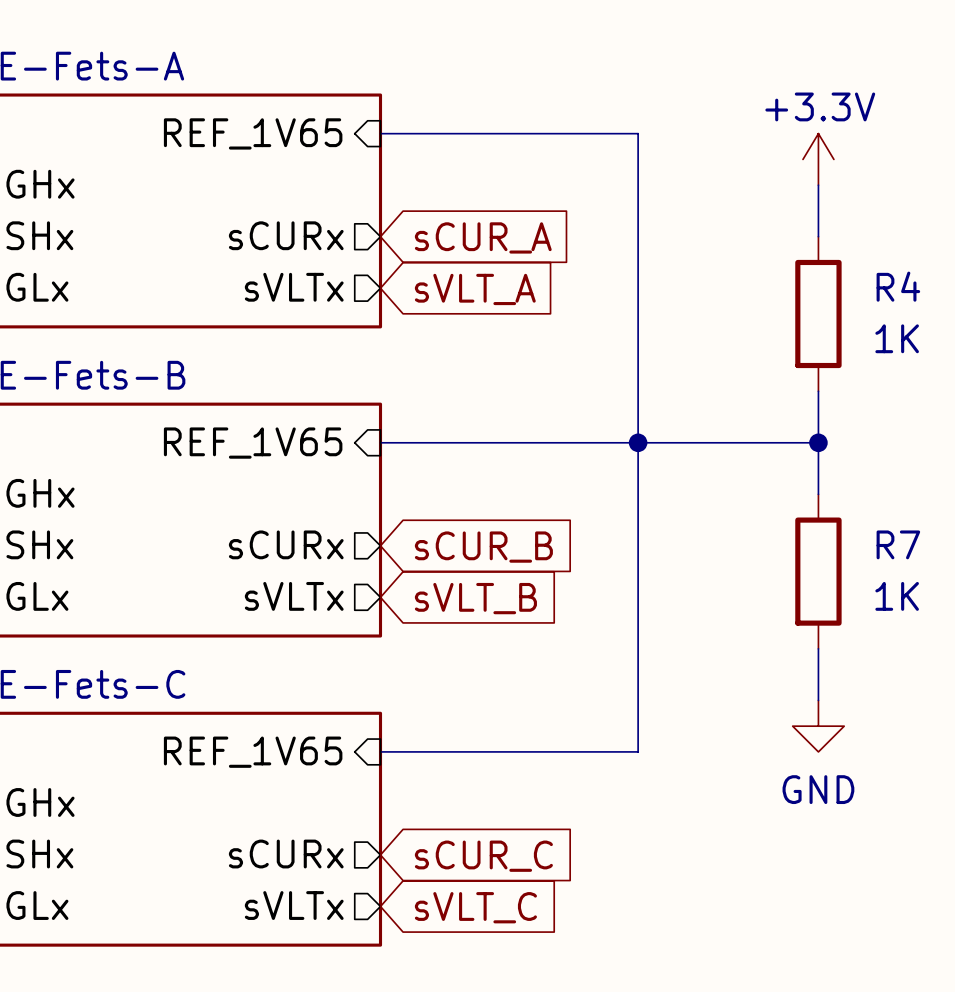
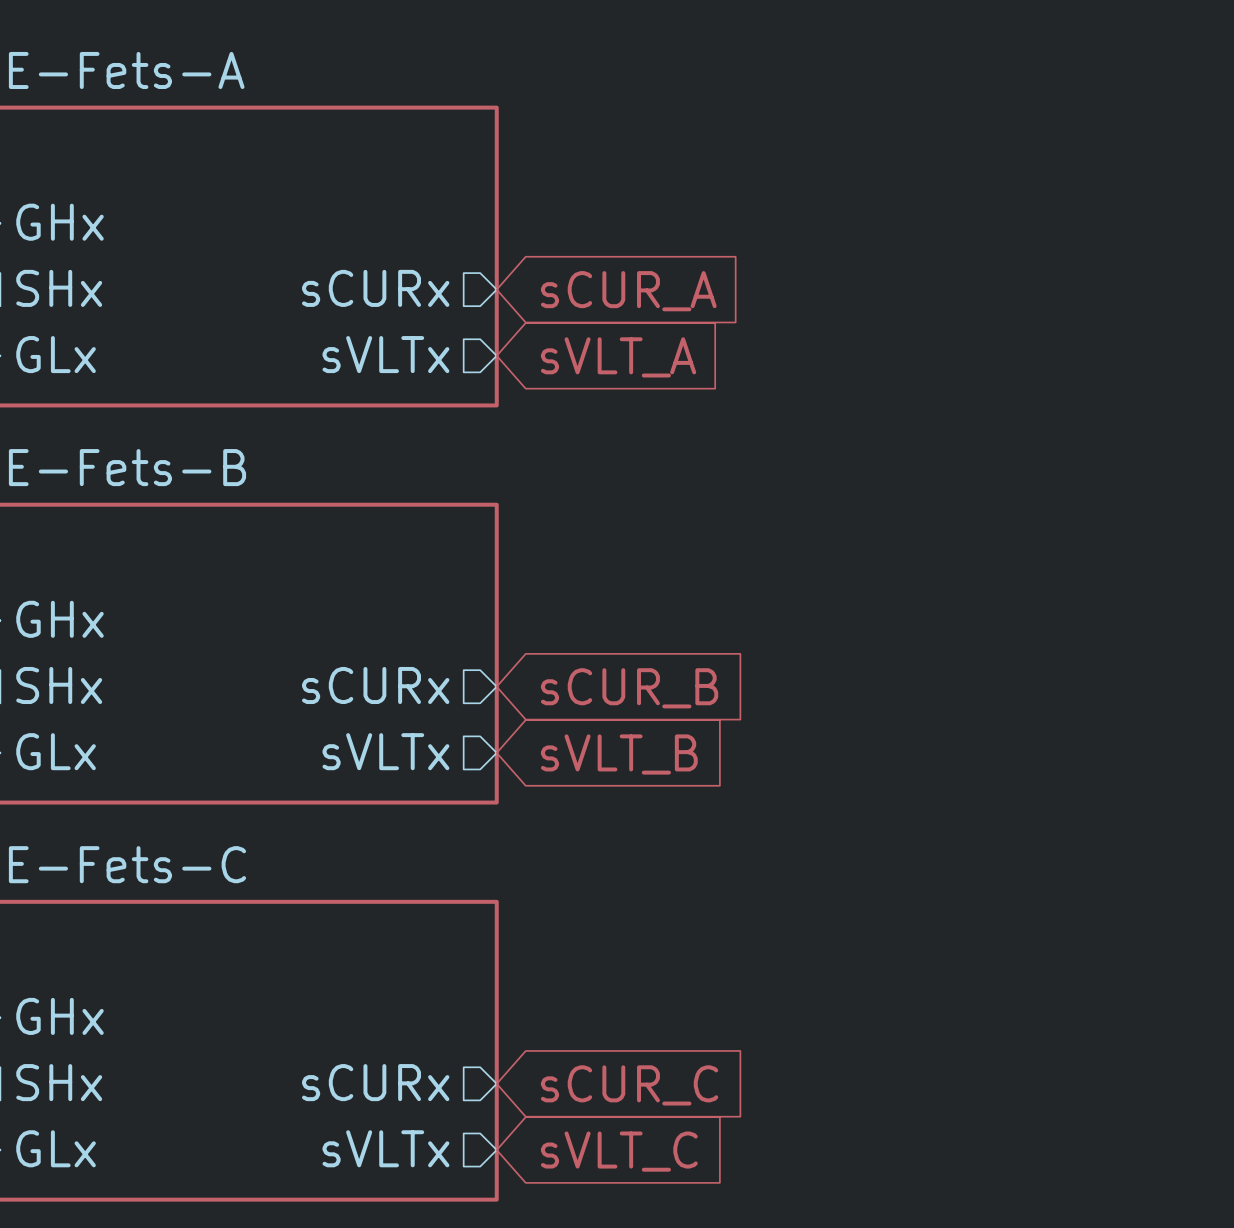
sheet pin: REF_1V65 (253, 133) -> none
wire: (380, 133) (638, 133) (638, 751) (380, 751) -> none
power symbol: +3.3V (818, 159) -> none
wire: (818, 185) (818, 236) -> none
R4: 1K (818, 313) -> none
wire: (818, 391) (818, 494) -> none
wire: (380, 442) (818, 442) -> none
junction: (638, 442) -> none
junction: (818, 442) -> none
sheet pin: REF_1V65 (253, 443) -> none
R7: 1K (818, 571) -> none
wire: (818, 648) (818, 700) -> none
power symbol: GND (818, 726) -> none
sheet pin: REF_1V65 (253, 752) -> none

